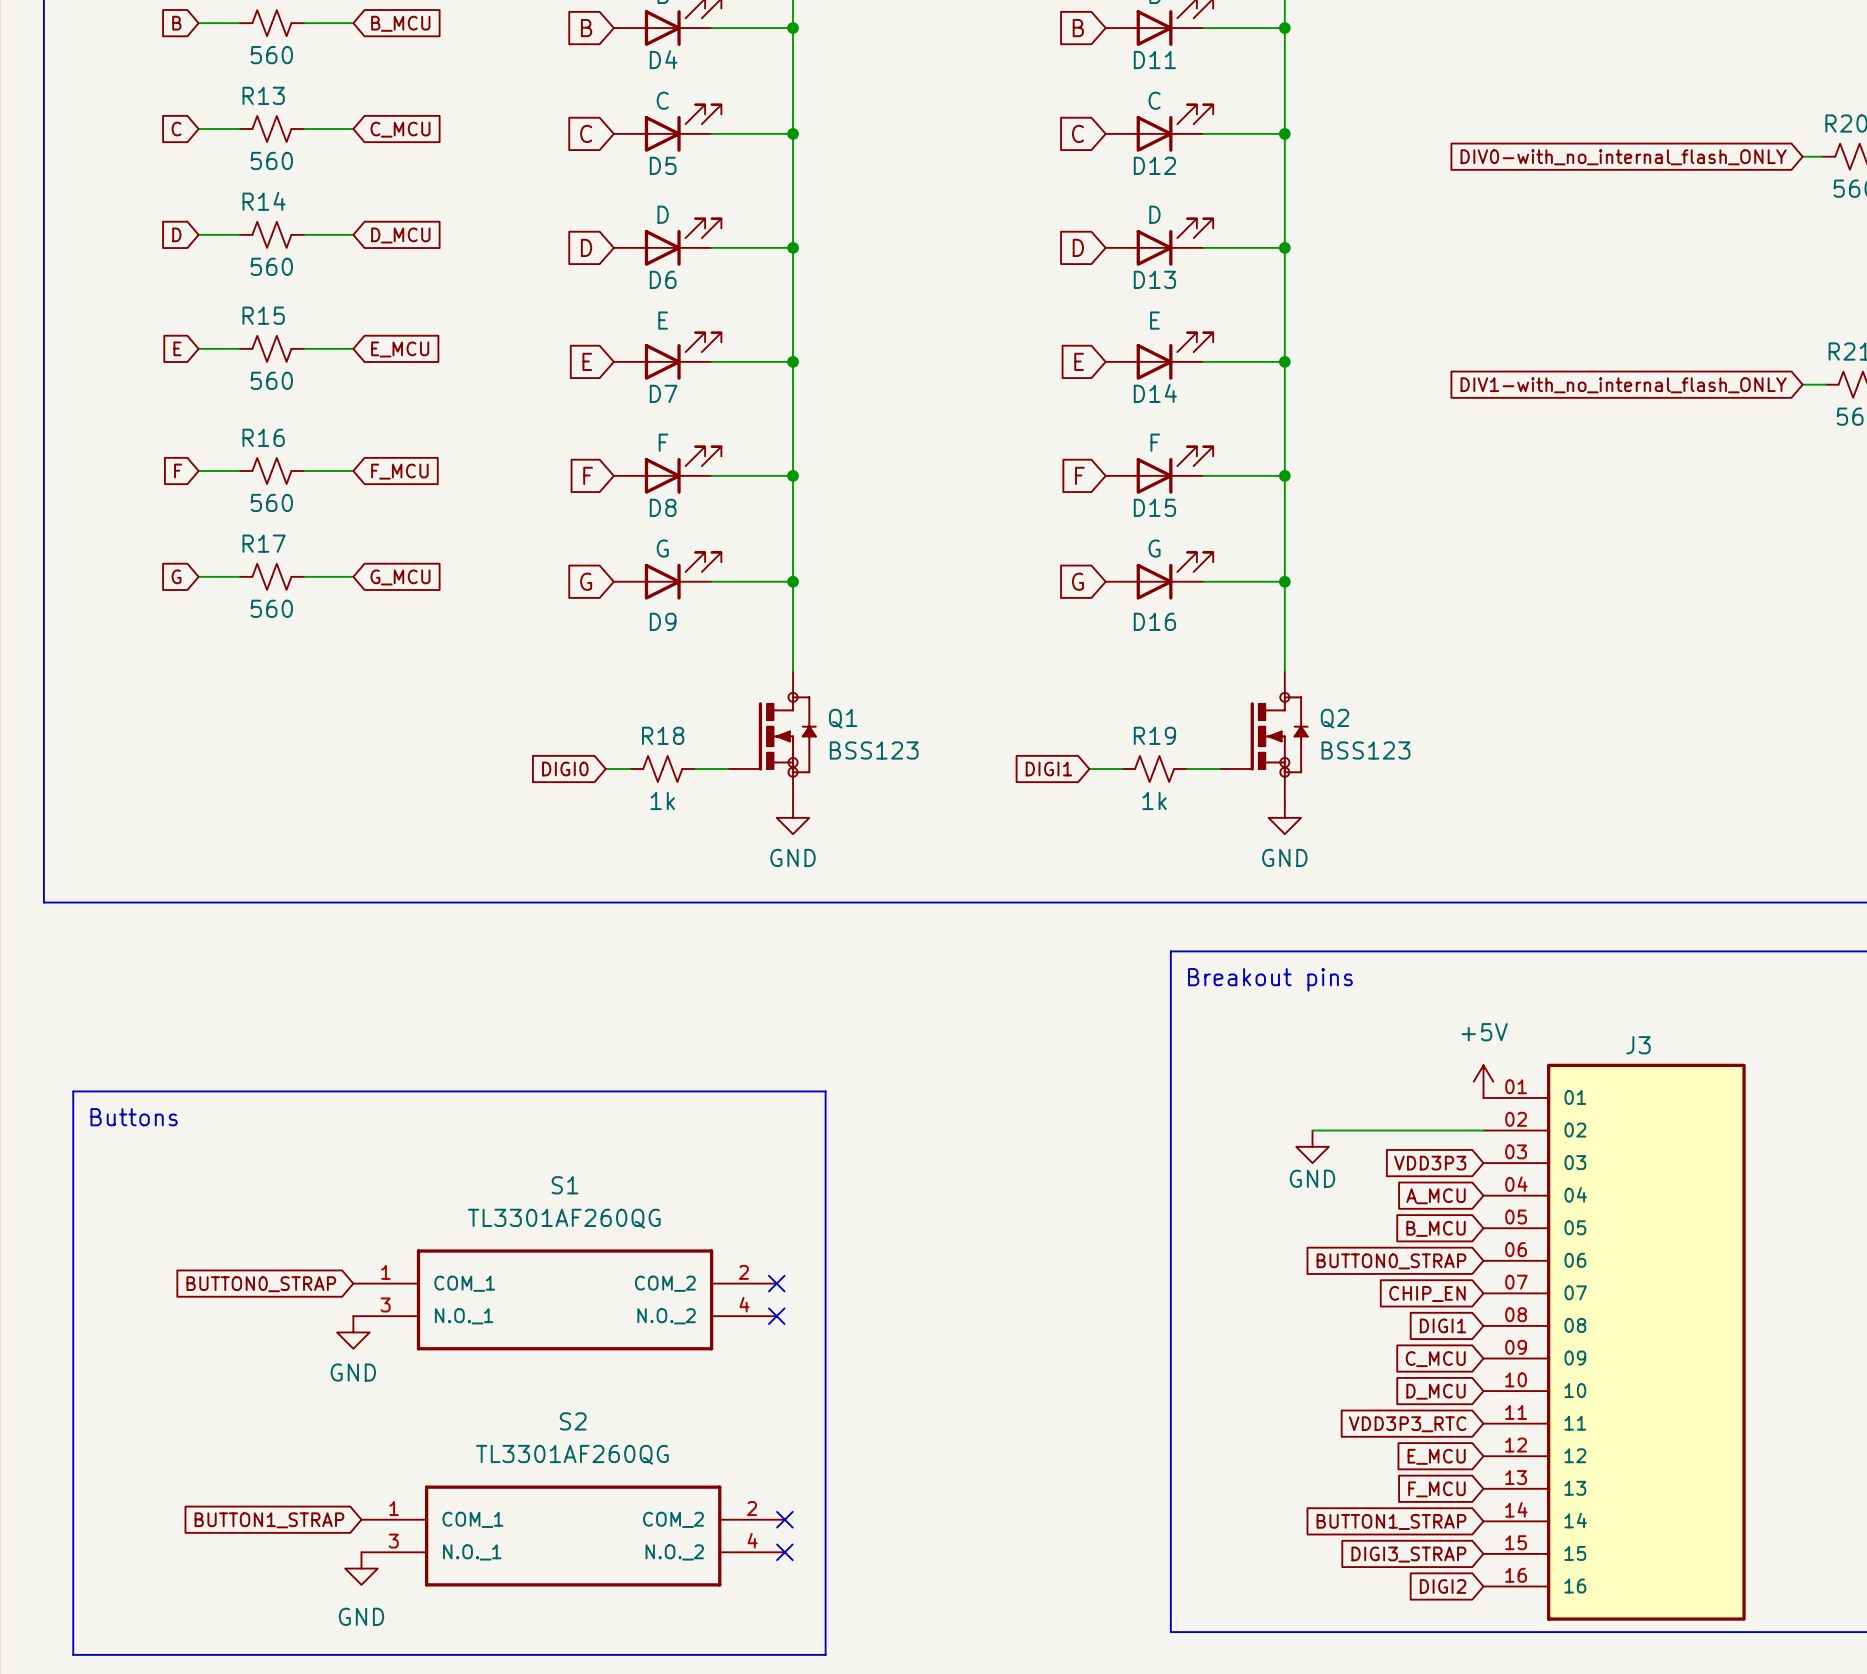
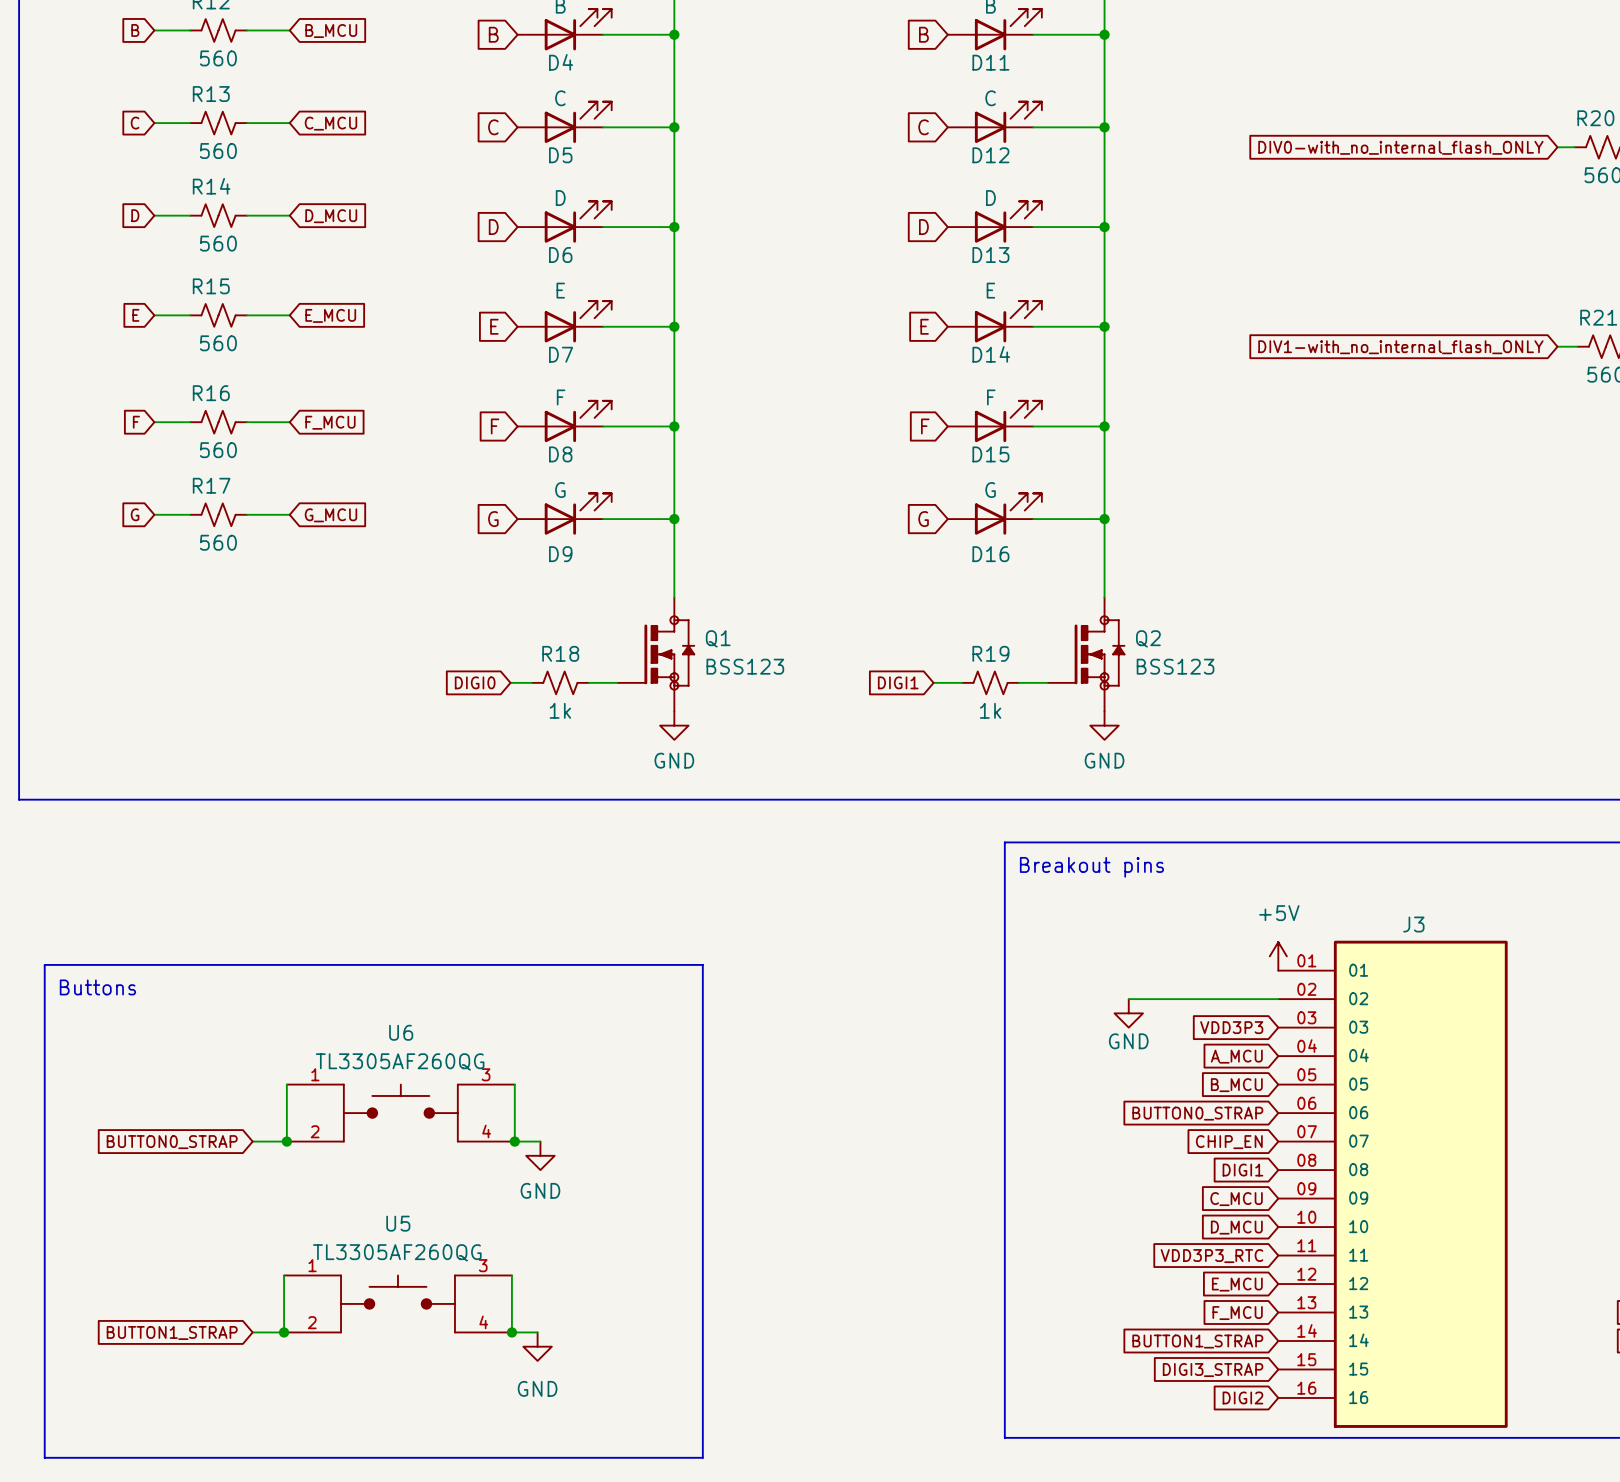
wire: none -> (286, 1084) (286, 1141) (252, 1141)
wire: none -> (514, 1084) (514, 1141) (540, 1141)
U6: none -> TL3305AF260QG (400, 1113)
no-connect mark: (776, 1283) -> none
global label position: BUTTON0_STRAP (261, 1284) -> BUTTON0_STRAP (172, 1142)
junction: none -> (286, 1141)
junction: none -> (514, 1141)
S1: TL3301AF260QG (565, 1299) -> none
power symbol: none -> GND (540, 1155)
no-connect mark: (776, 1316) -> none
power symbol: GND (353, 1332) -> none
wire: none -> (284, 1275) (284, 1332) (252, 1332)
wire: none -> (511, 1275) (511, 1332) (537, 1332)
U5: none -> TL3305AF260QG (397, 1303)
junction: none -> (284, 1332)
junction: none -> (511, 1332)
no-connect mark: (784, 1519) -> none
global label position: BUTTON1_STRAP (269, 1520) -> BUTTON1_STRAP (172, 1332)
power symbol: none -> GND (537, 1346)
S2: TL3301AF260QG (573, 1536) -> none
no-connect mark: (784, 1552) -> none
power symbol: GND (361, 1568) -> none

